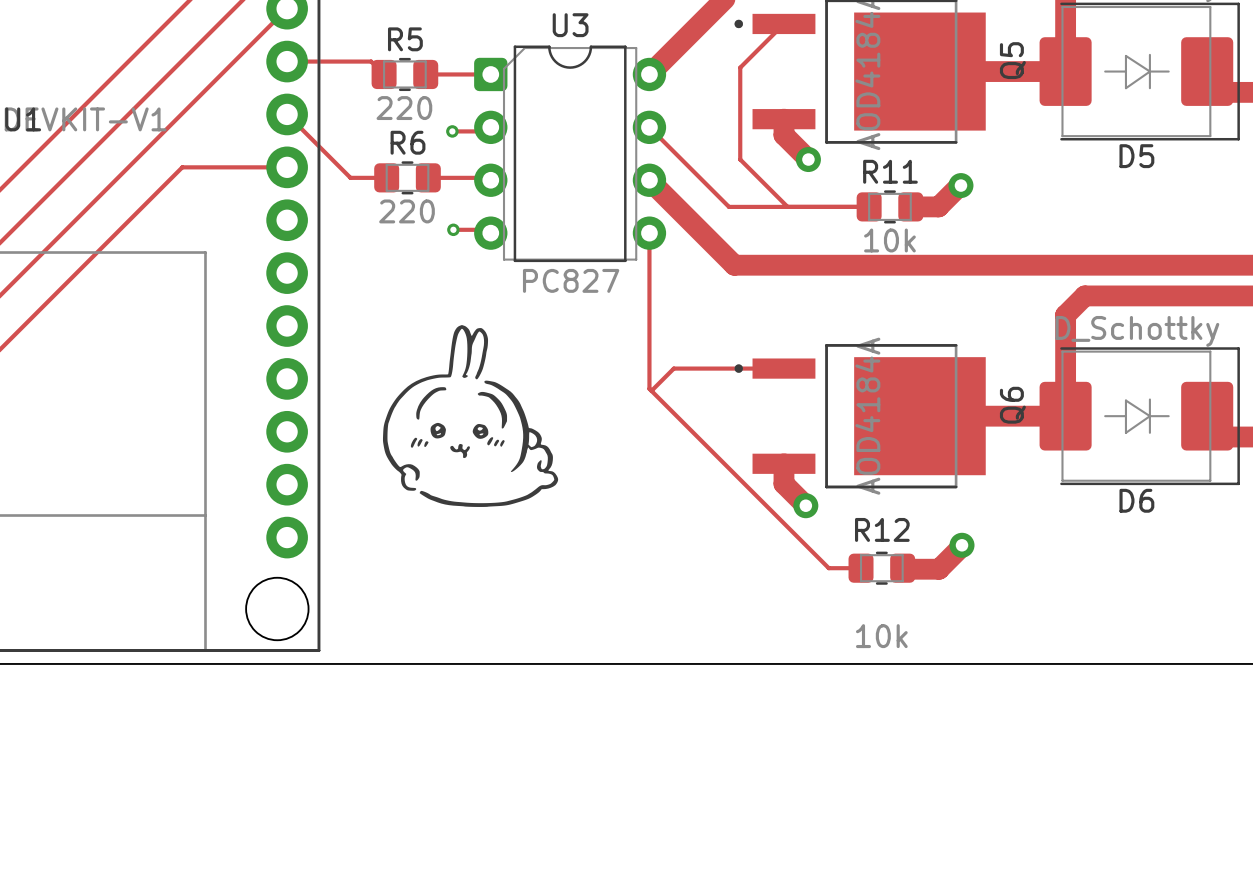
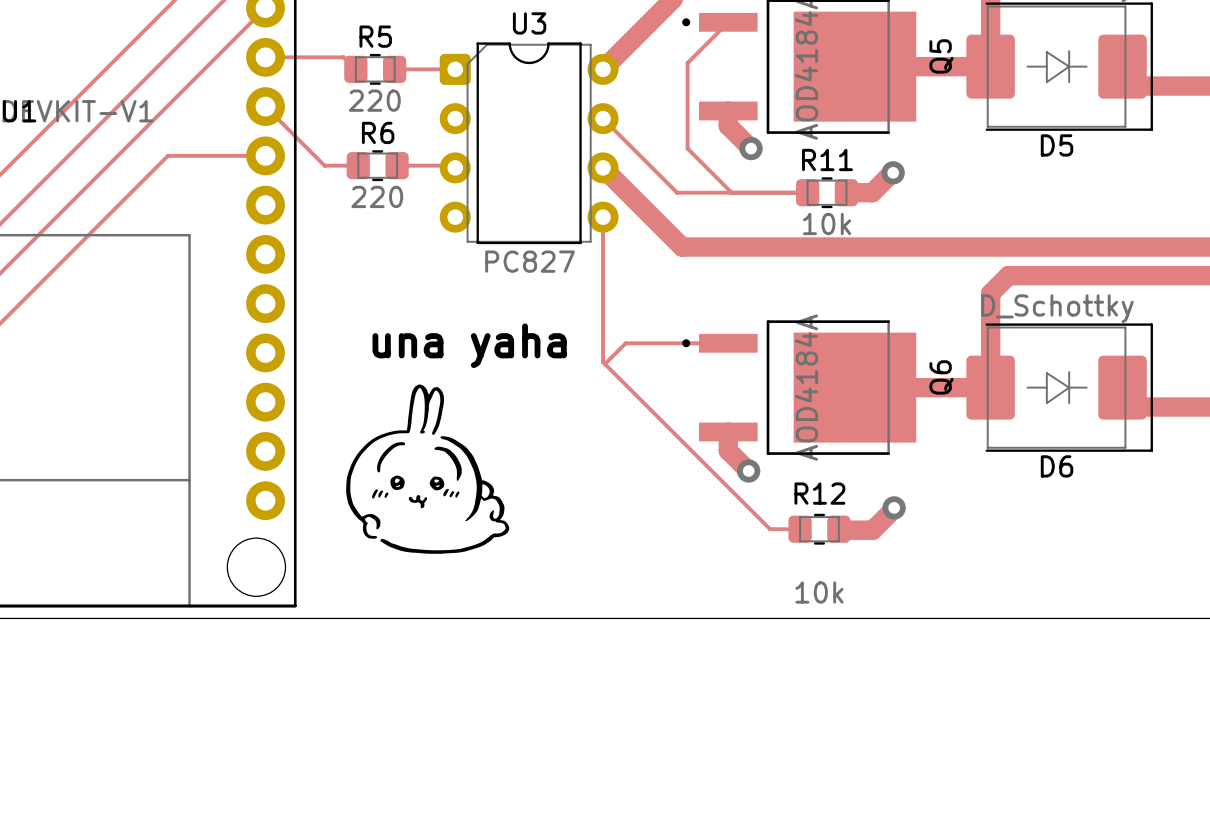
track: (452, 131) (486, 131) -> none
via: (452, 131) -> none
track: (453, 229) (487, 229) -> none
via: (453, 229) -> none
text: none -> una yaha (469, 345)
drawing position: (470, 416) -> (427, 469)

